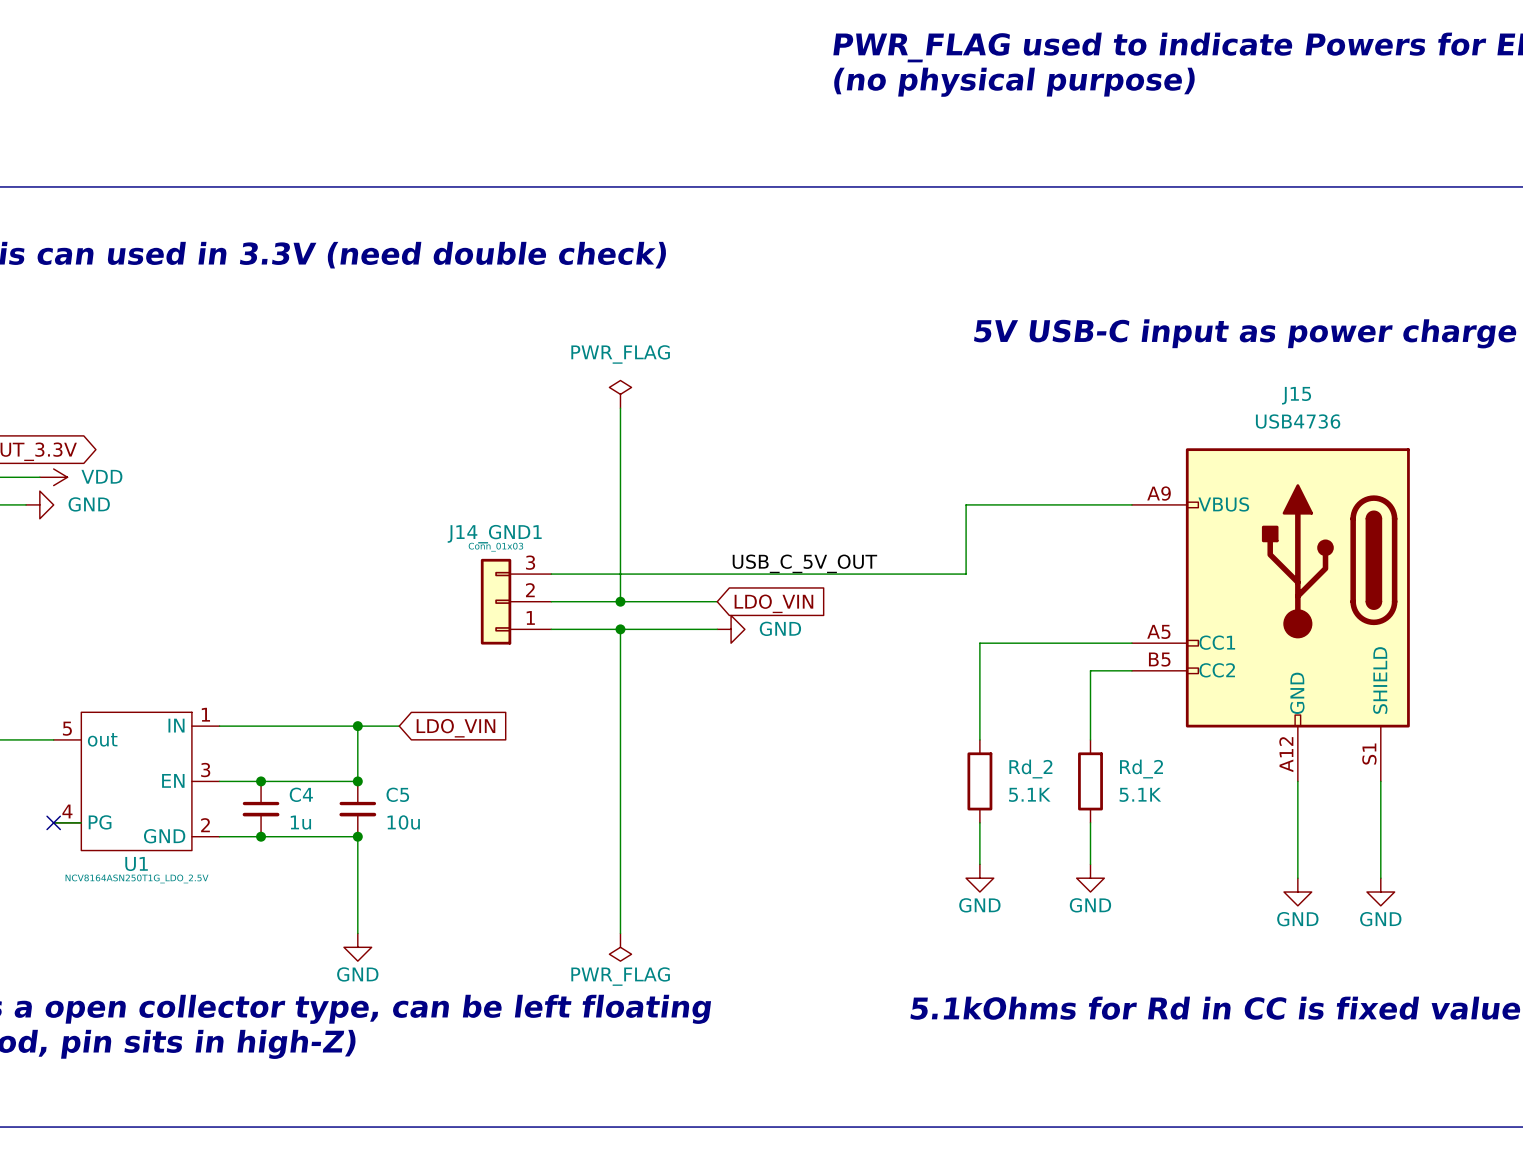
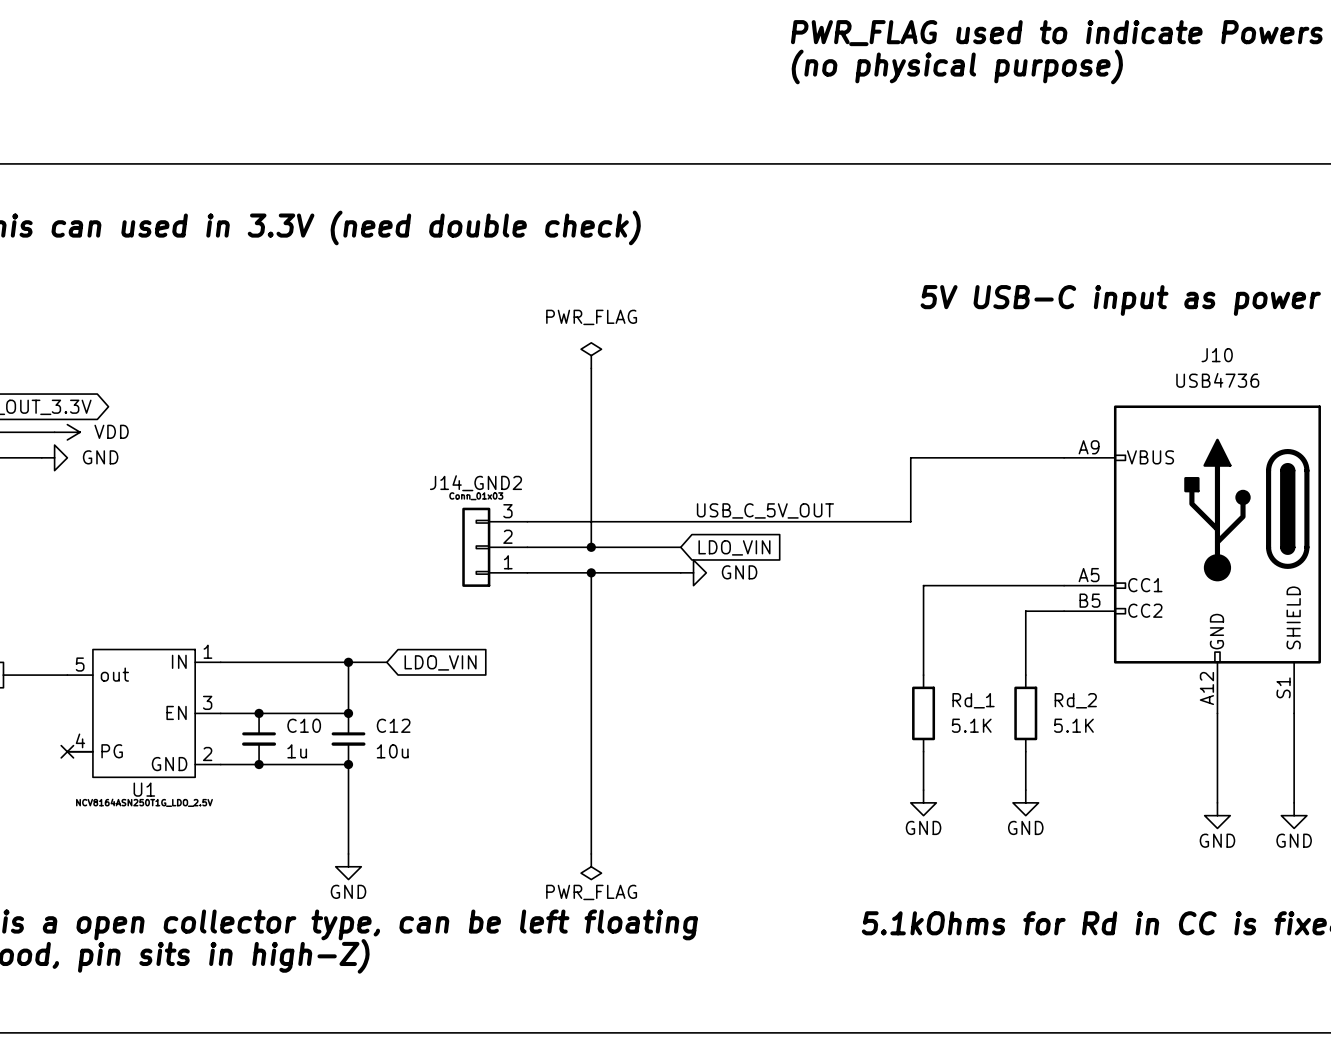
J15 name: J15 (1296, 395) -> J10 (1217, 355)
J14_GND1 name: J14_GND1 (494, 534) -> J14_GND2 (475, 483)
Rd_2 name: Rd_2 (1030, 769) -> Rd_1 (973, 700)
C4 name: C4 (301, 794) -> C10 (304, 725)
C5 name: C5 (397, 794) -> C12 (393, 725)

